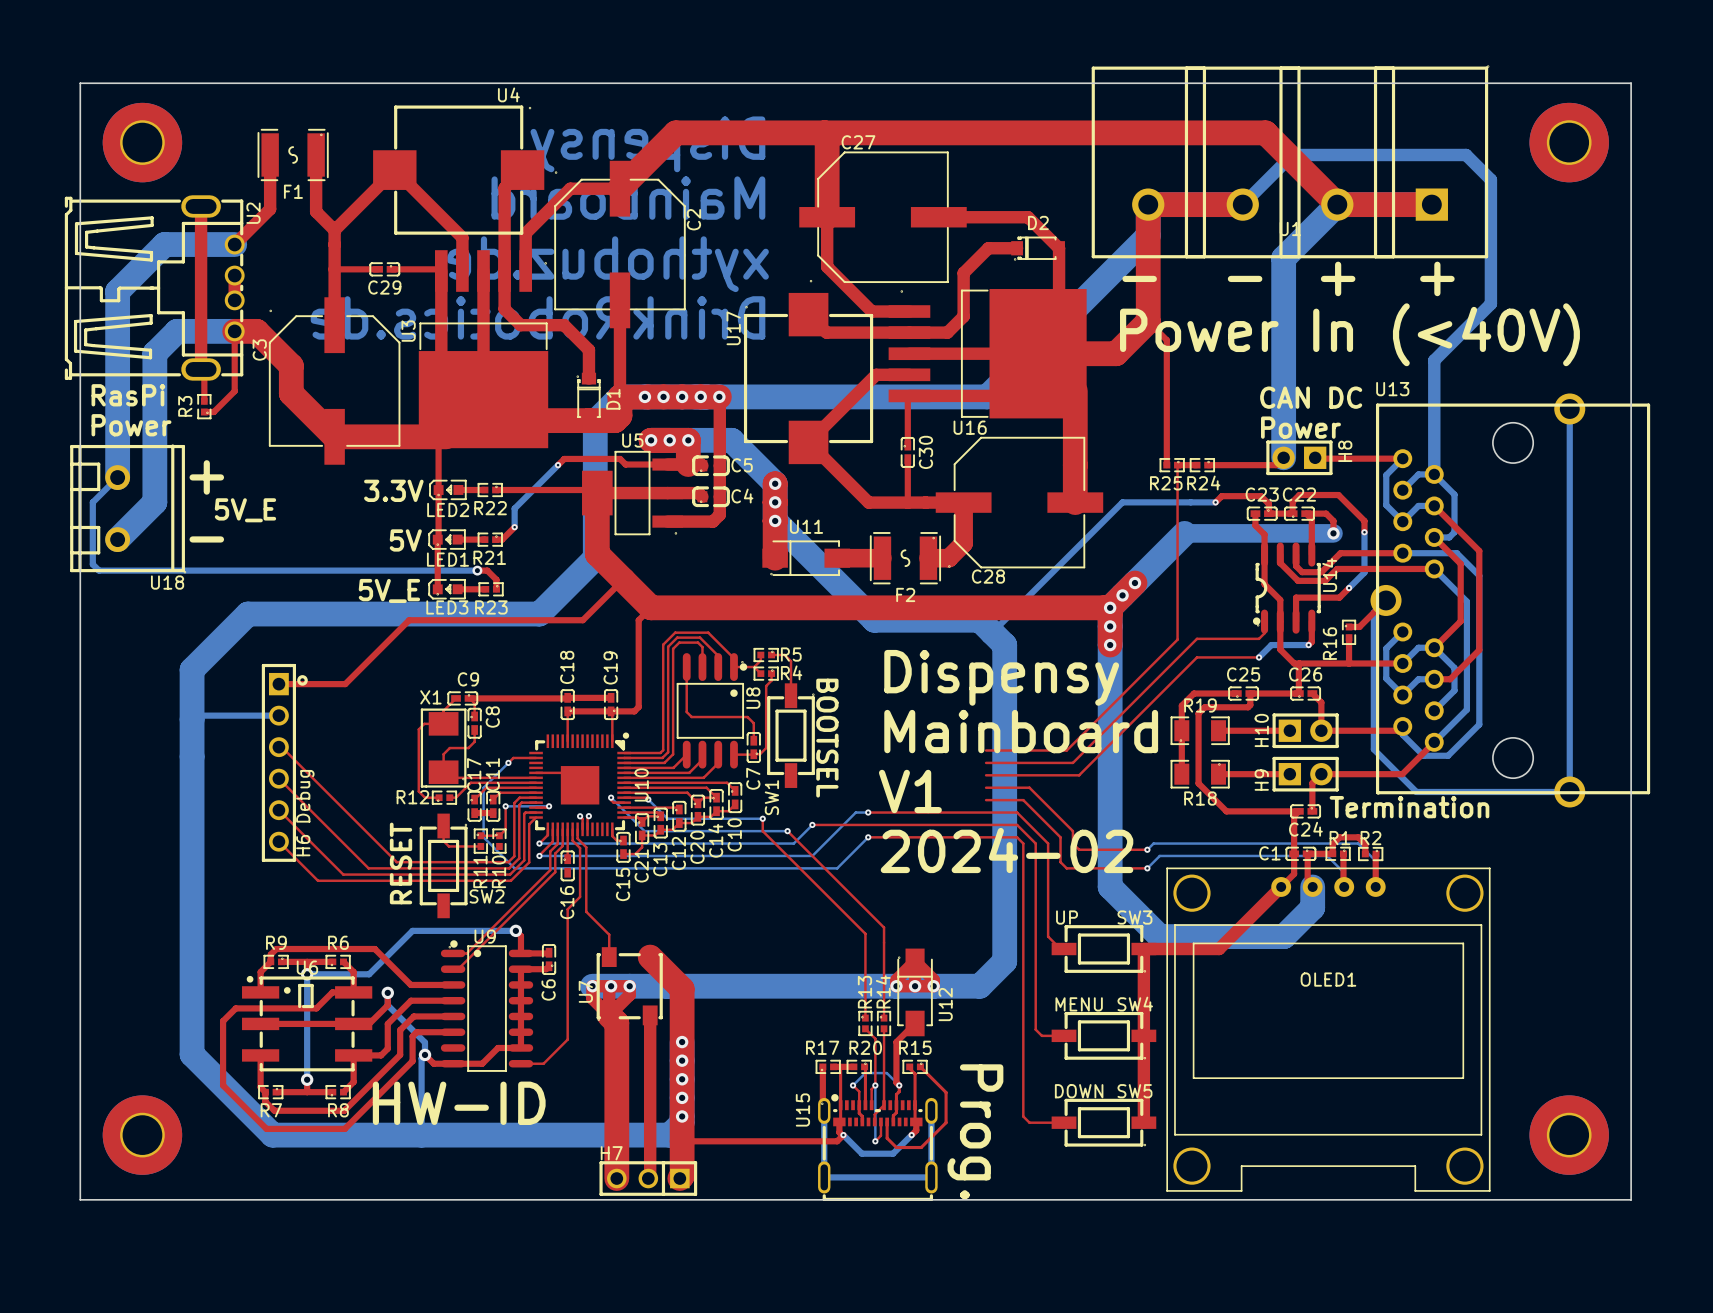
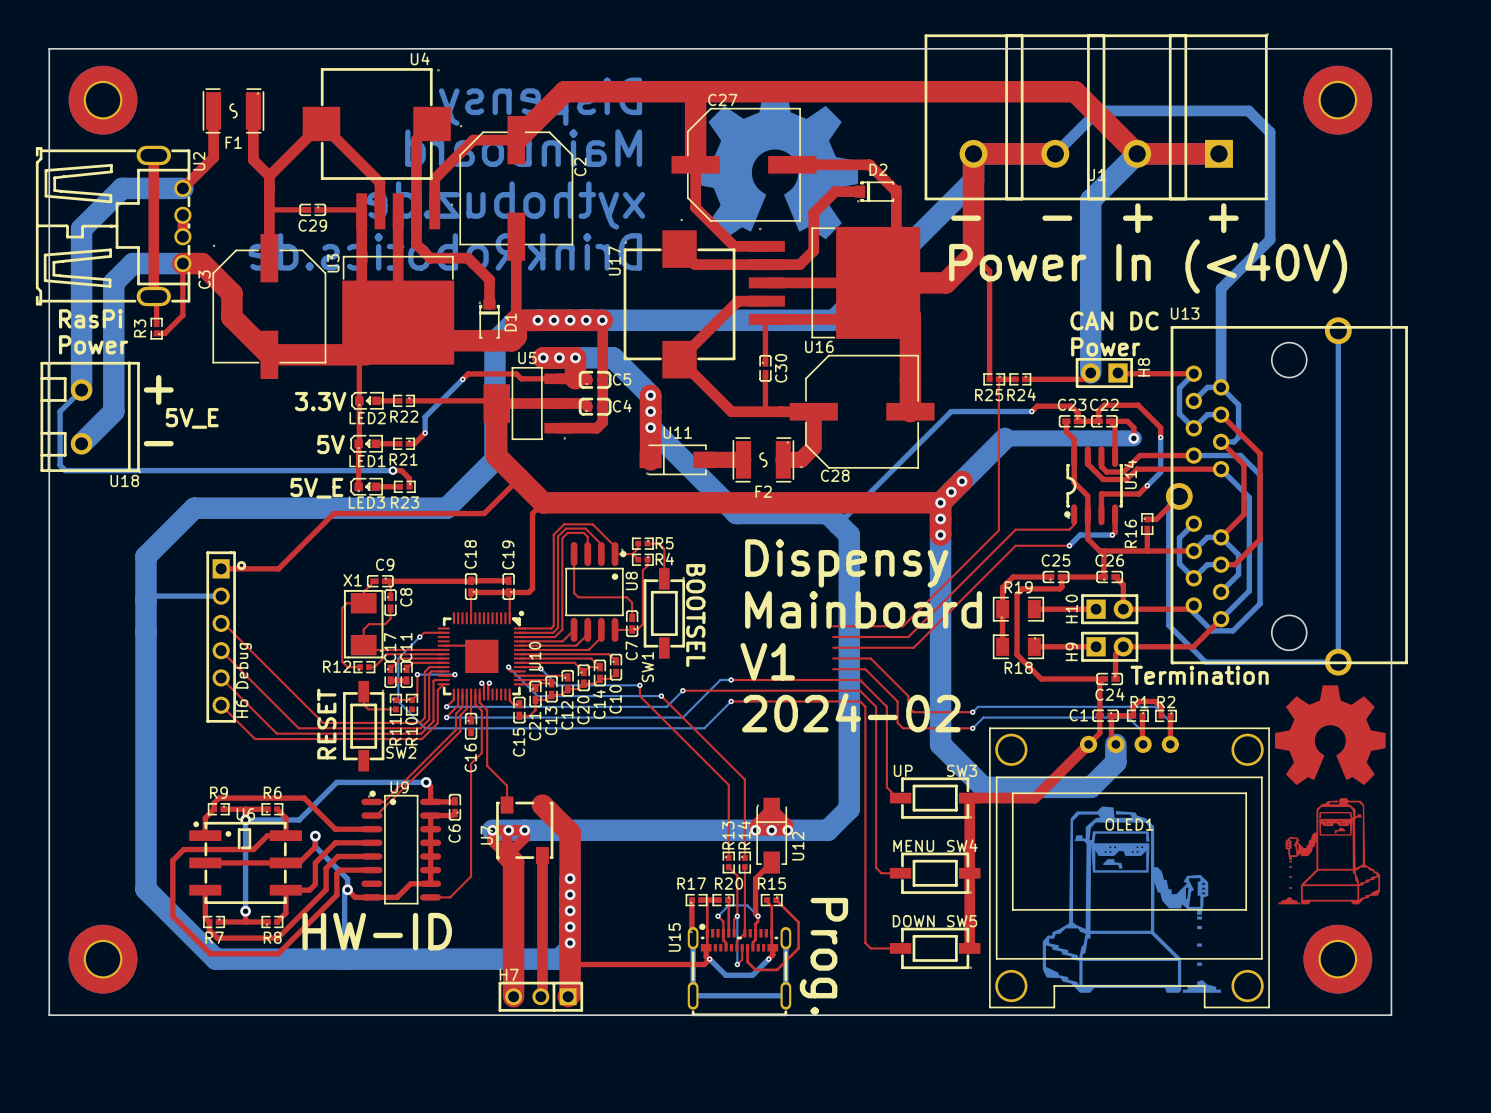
drawing: none -> [692, 89, 859, 239]
drawing: none -> [1275, 685, 1386, 785]
drawing: none -> [1278, 797, 1381, 905]
drawing: none -> [1042, 806, 1221, 993]

